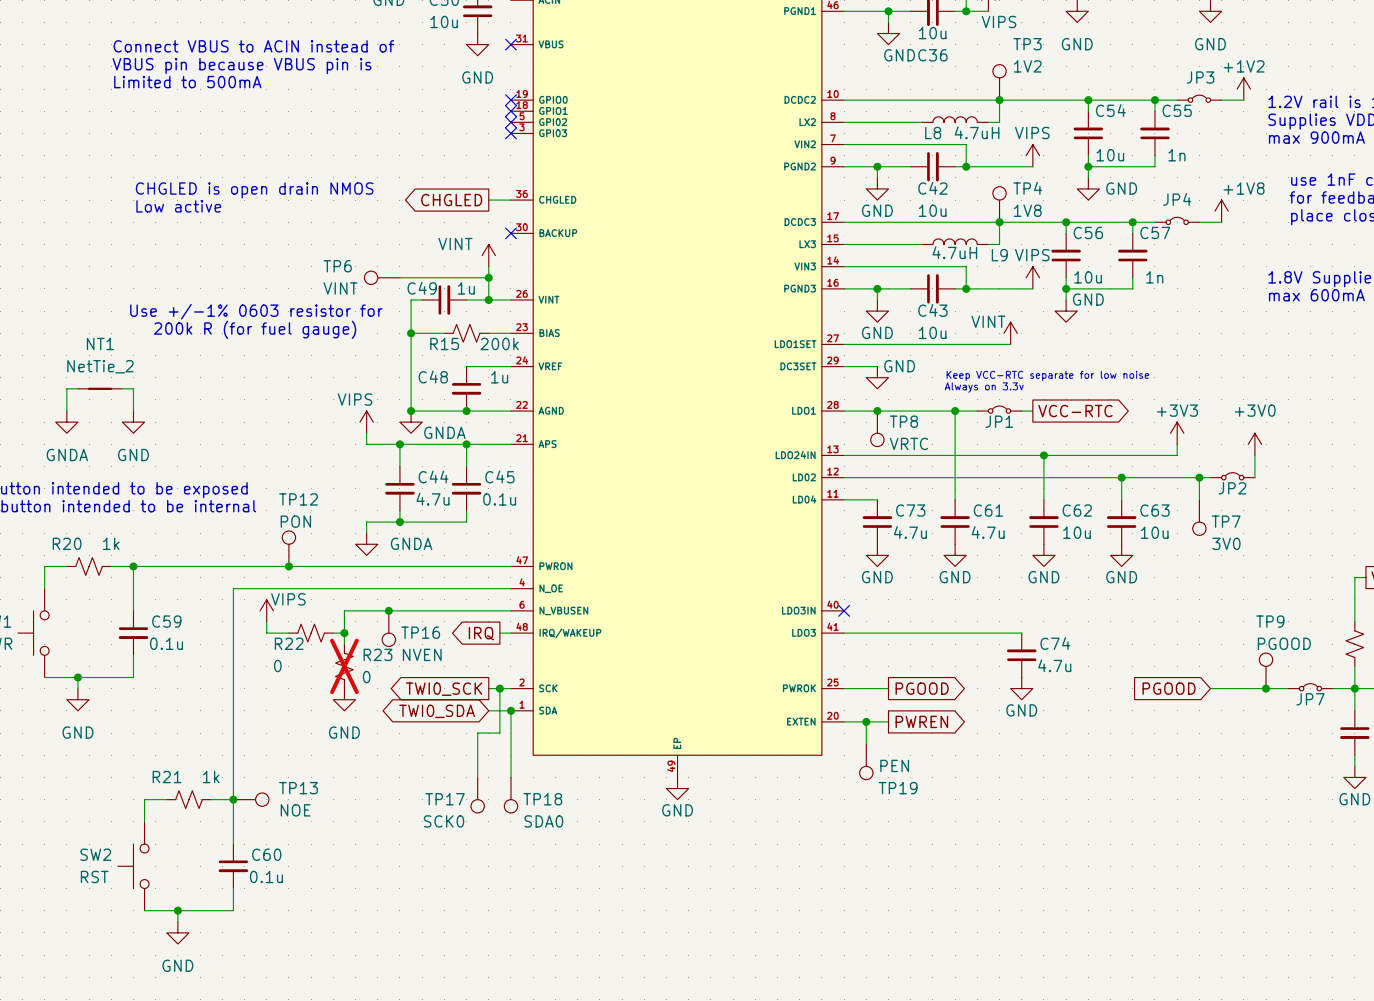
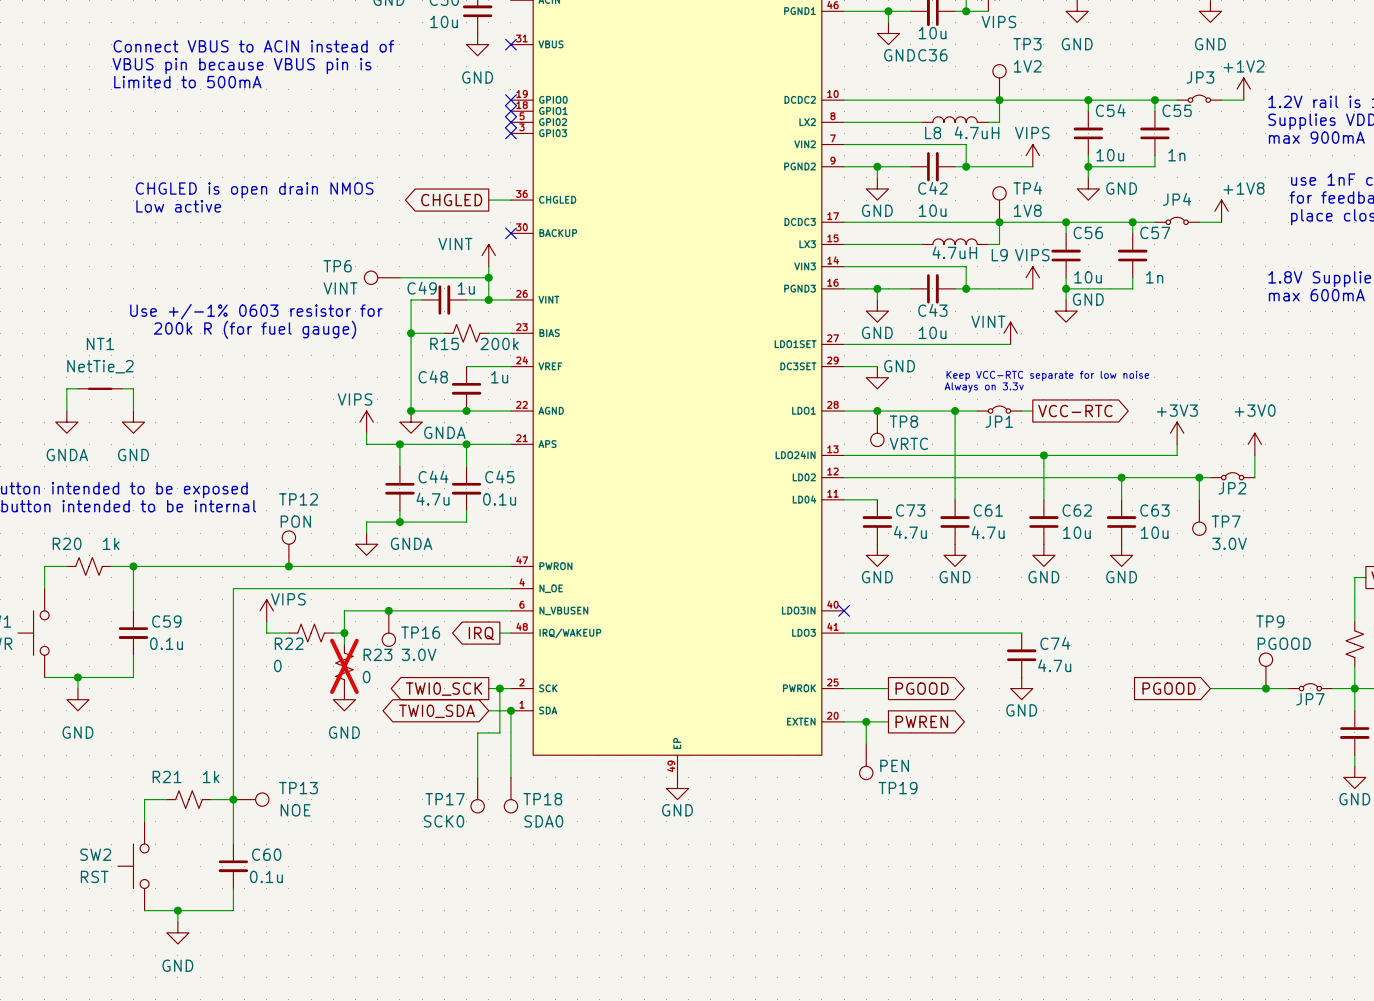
TP7 value: 3V0 (1226, 543) -> 3.0V (1229, 543)
TP16 value: NVEN (422, 654) -> 3.0V (419, 654)

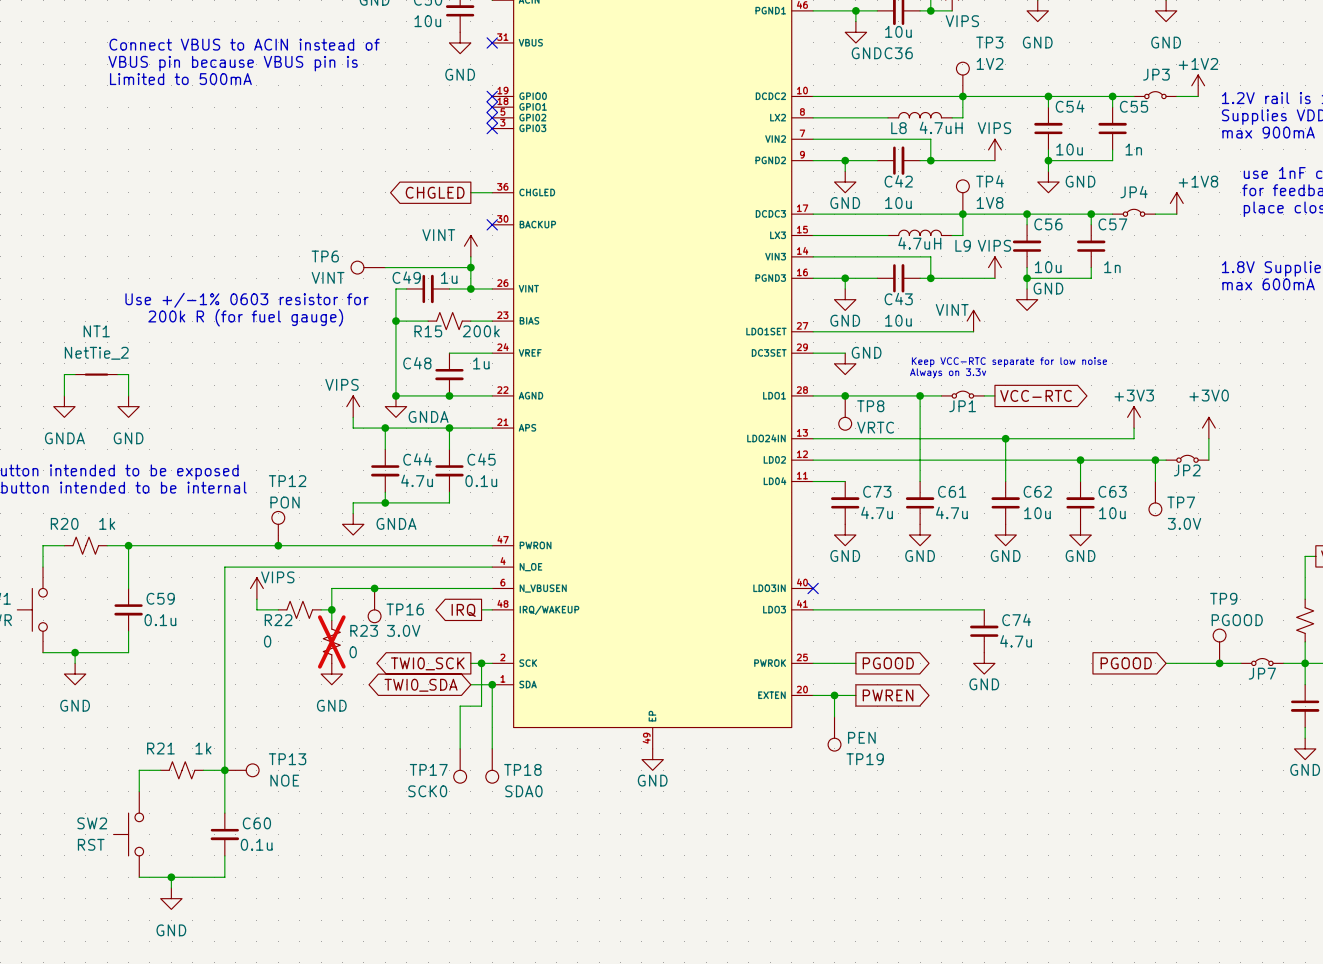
text: CHGLED is open drain NMOS (254, 190) -> none
text: Low active (178, 206) -> none

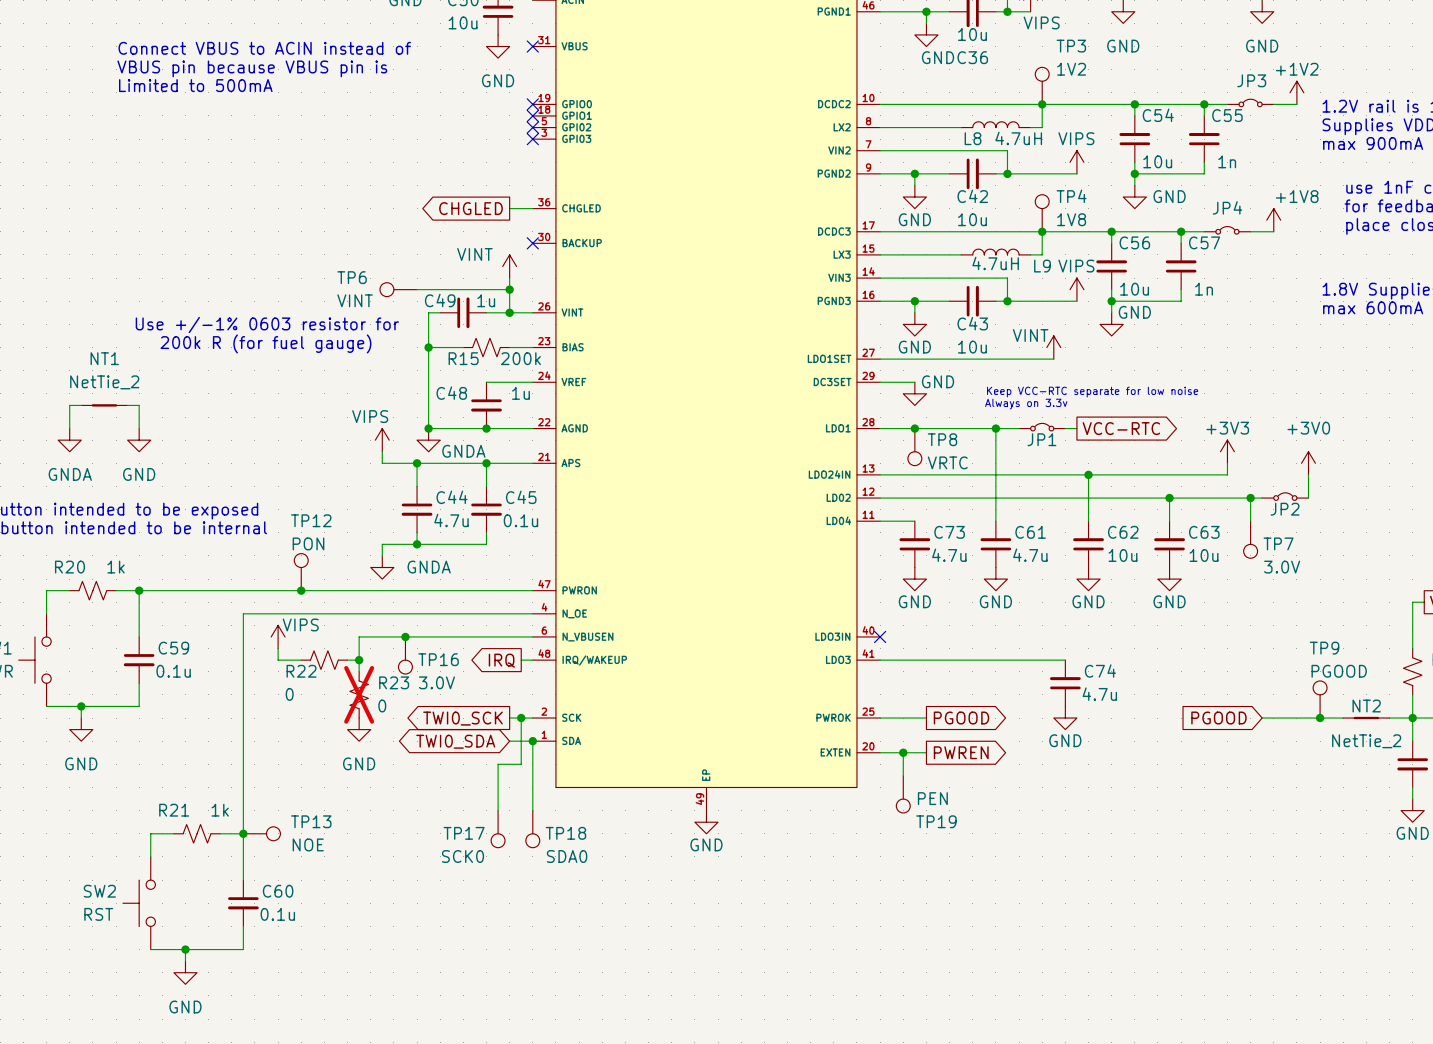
JP7: (1262, 662) -> none
NT2: none -> NetTie_2 (1366, 718)

